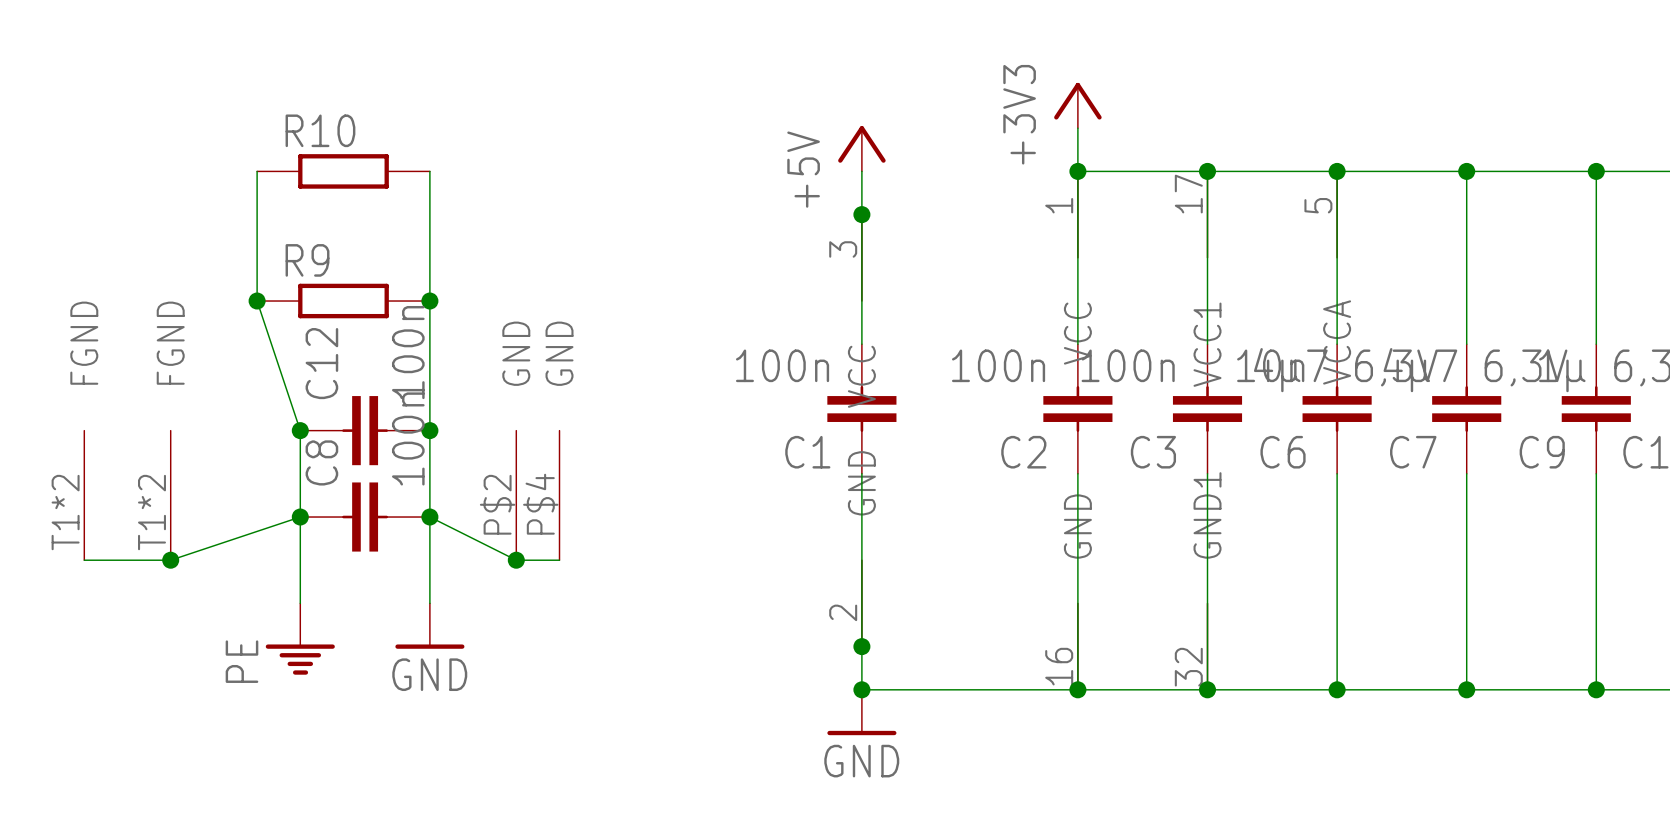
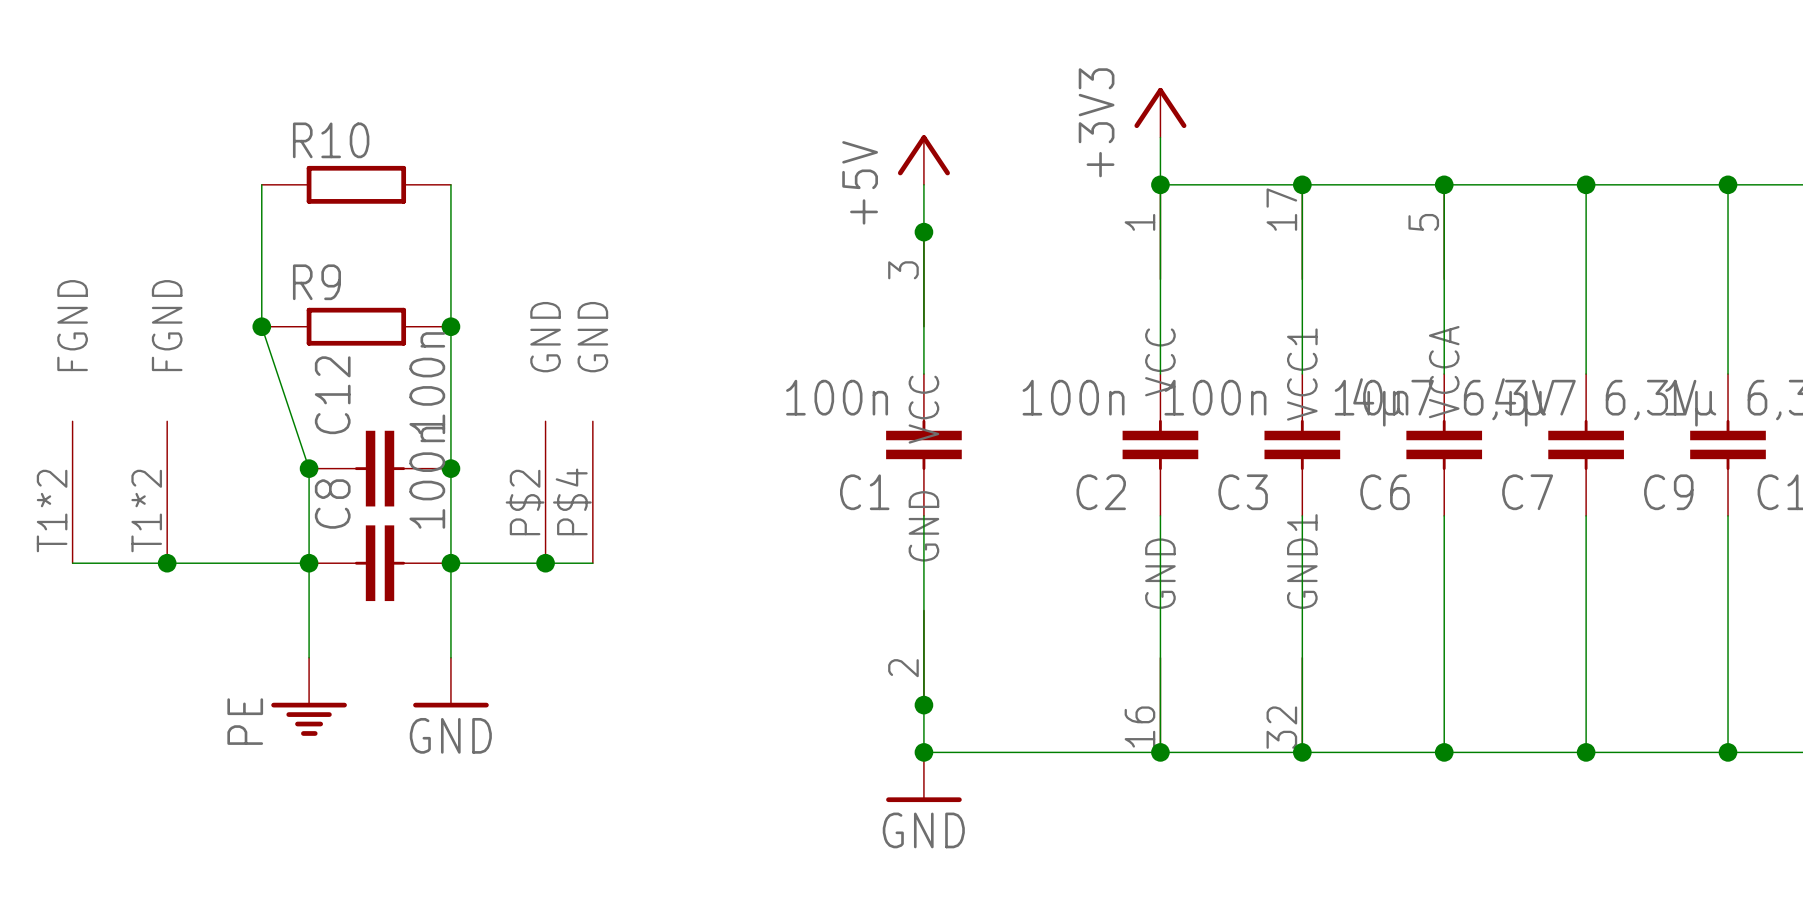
part position: (84, 495) -> (72, 492)
part position: (170, 495) -> (167, 492)
part position: (516, 495) -> (545, 492)
part position: (559, 495) -> (592, 492)
wire: (300, 517) (170, 560) (84, 560) -> (309, 563) (72, 563)
wire: (429, 517) (516, 560) (559, 560) -> (450, 563) (592, 563)
junction position: (170, 560) -> (167, 563)
junction position: (516, 560) -> (545, 563)

